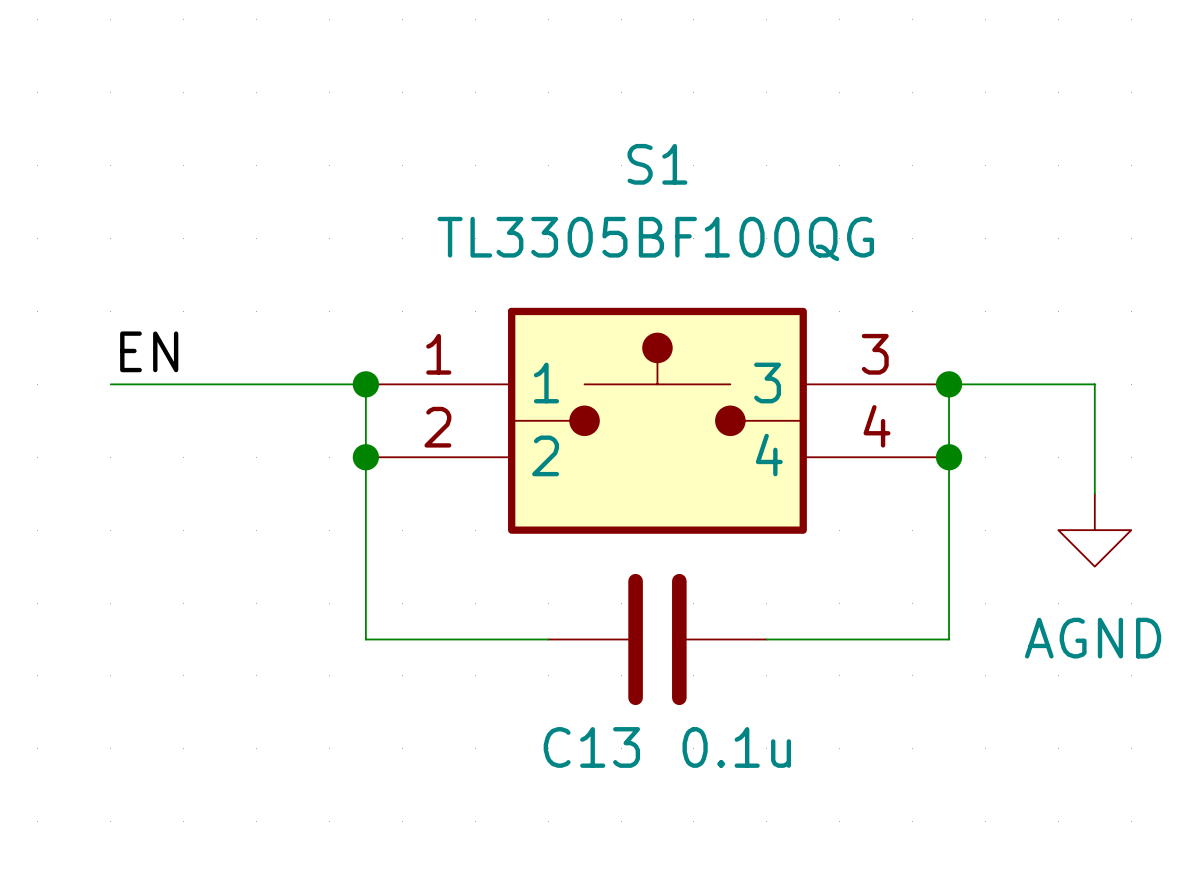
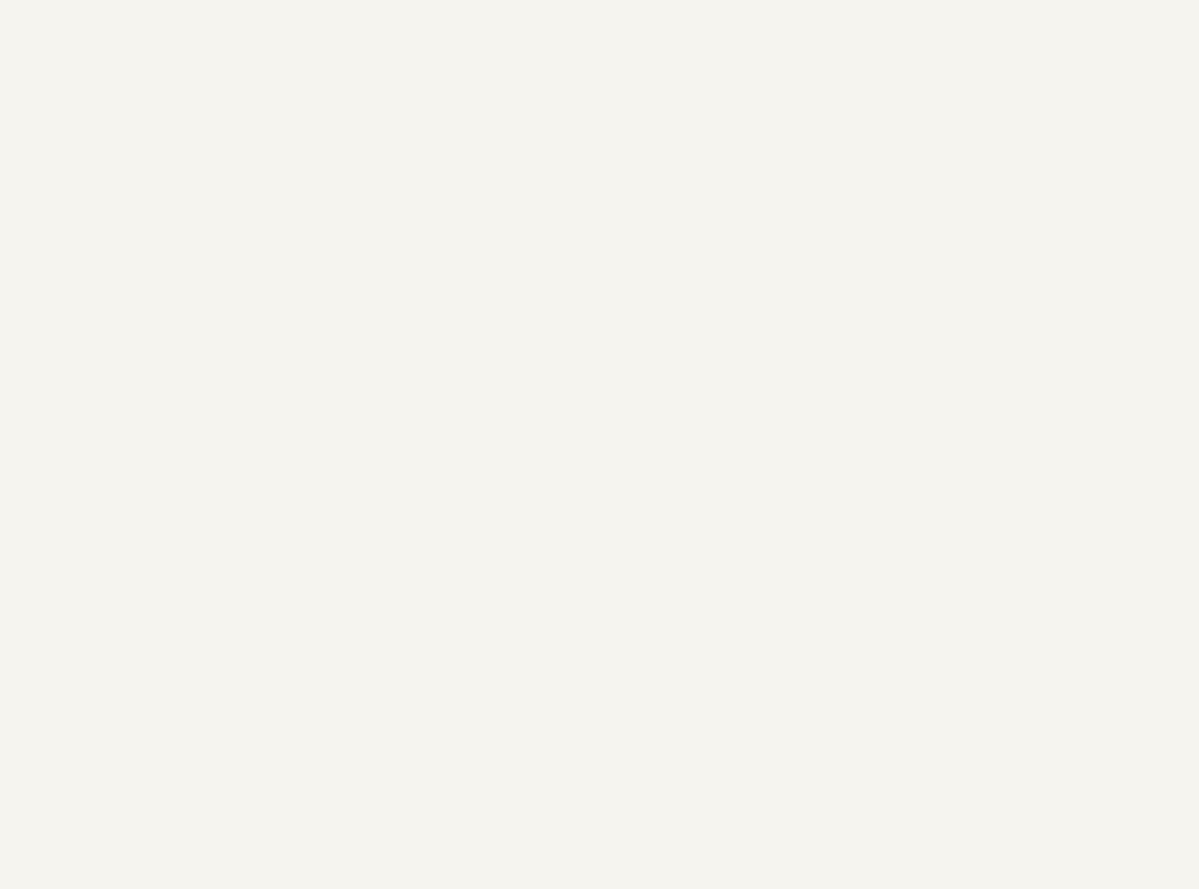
label: EN (149, 351) -> none
wire: (110, 384) (365, 384) (365, 639) (548, 639) -> none
junction: (365, 384) -> none
junction: (949, 384) -> none
S1: TL3305BF100QG (657, 420) -> none
junction: (365, 457) -> none
junction: (949, 457) -> none
wire: (1094, 493) (1094, 384) (949, 384) (949, 639) (766, 639) -> none
power symbol: AGND (1094, 530) -> none
C13: 0.1u (657, 639) -> none

